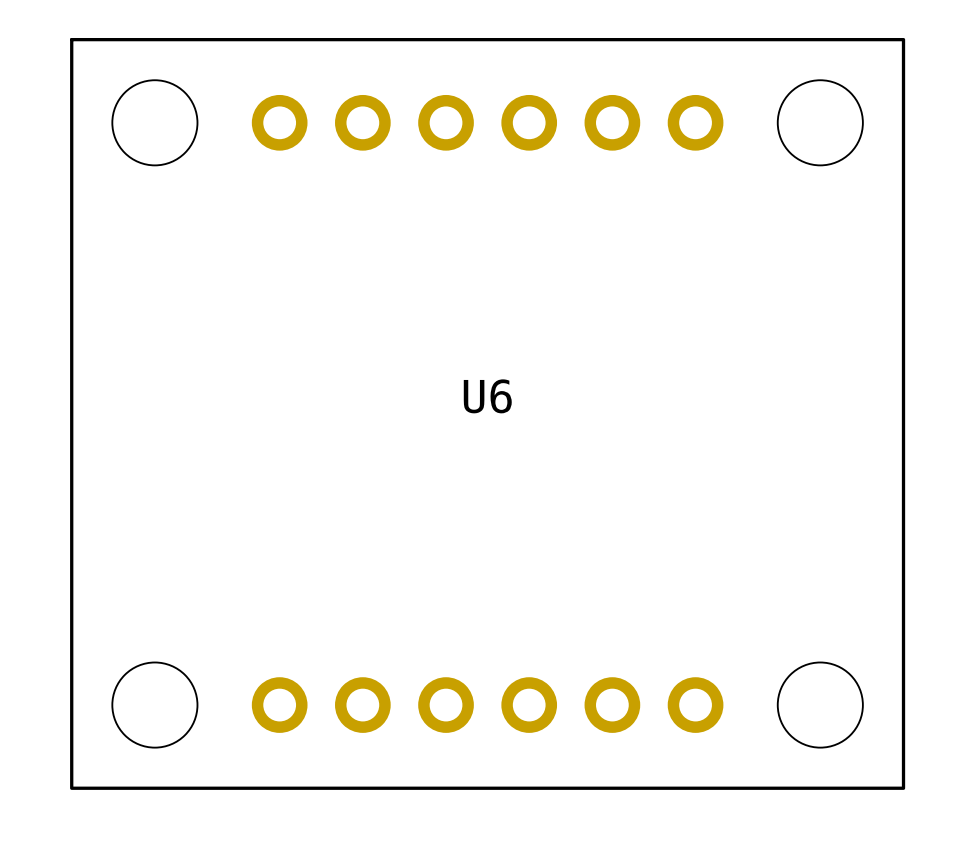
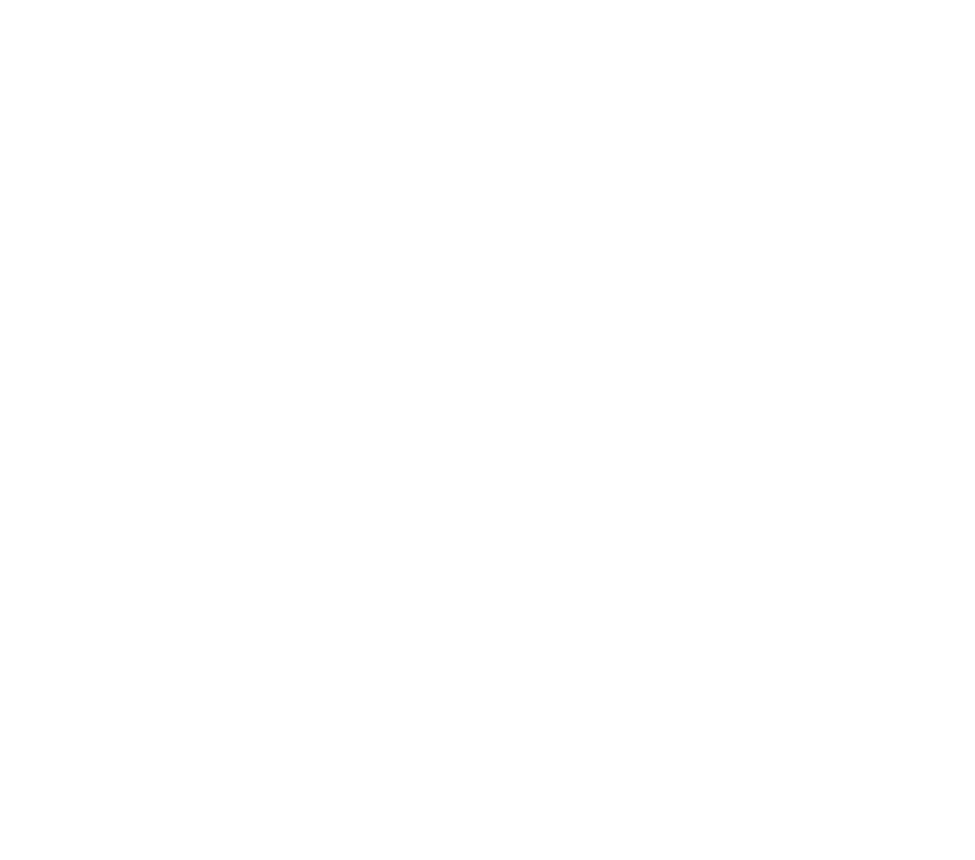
U6: (487, 413) -> none

